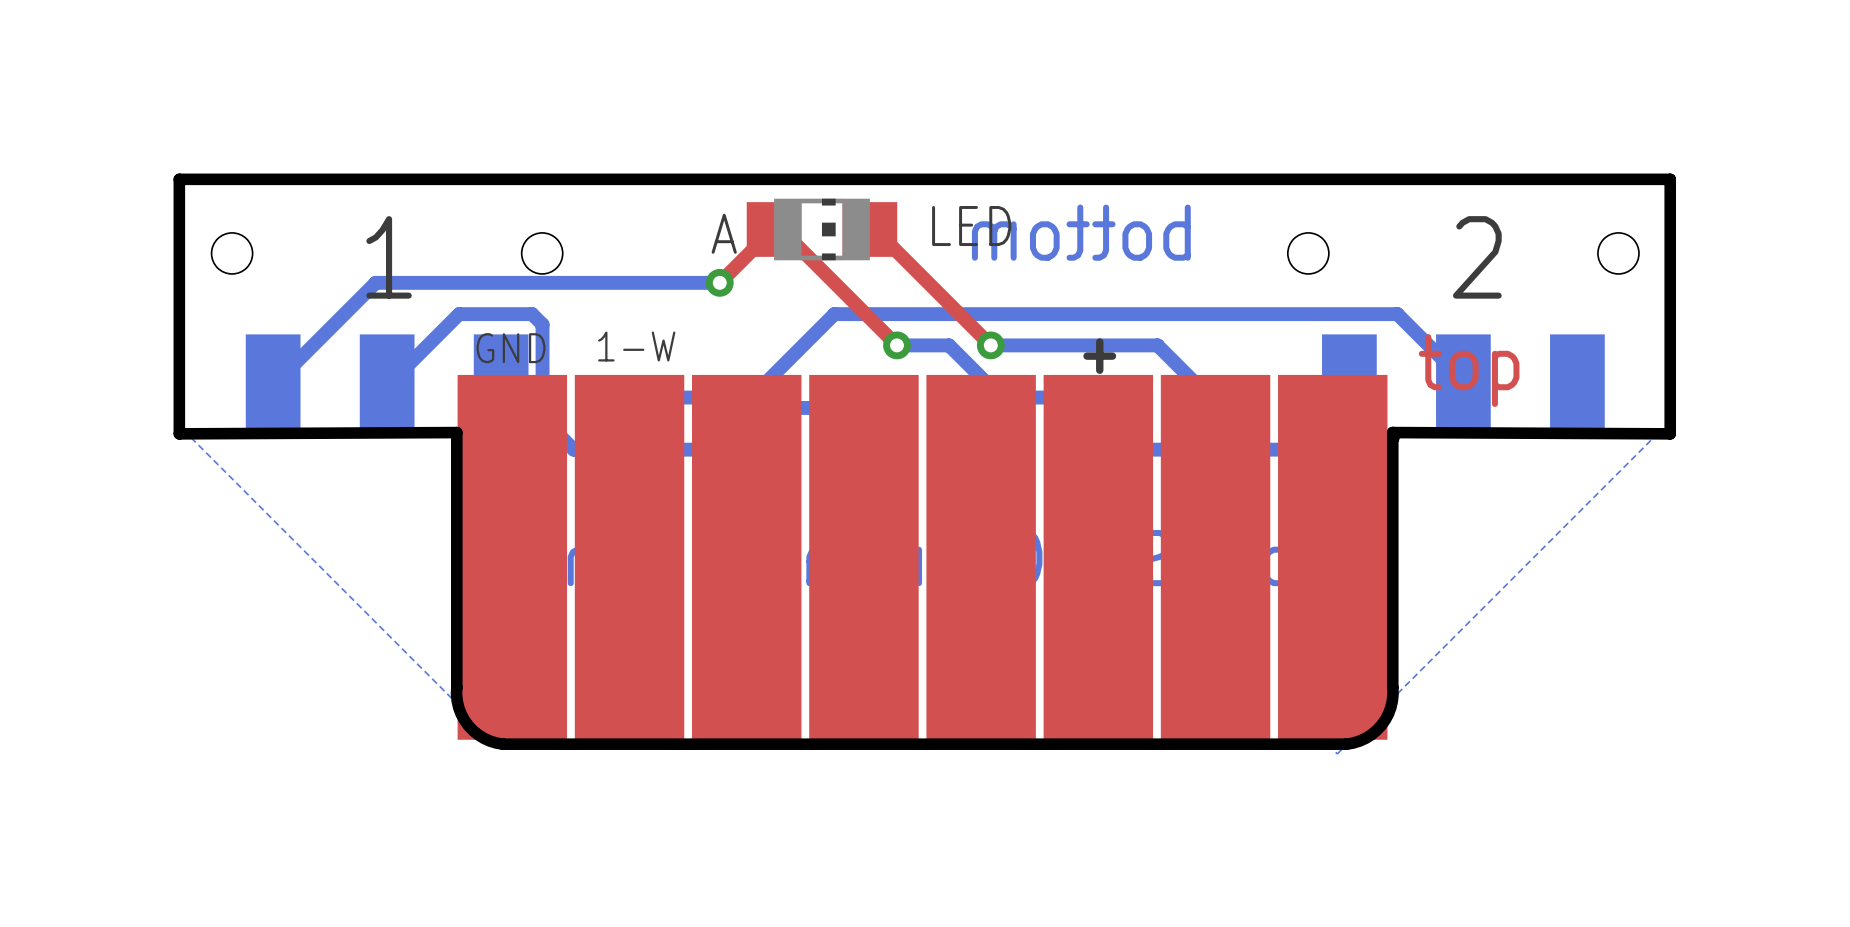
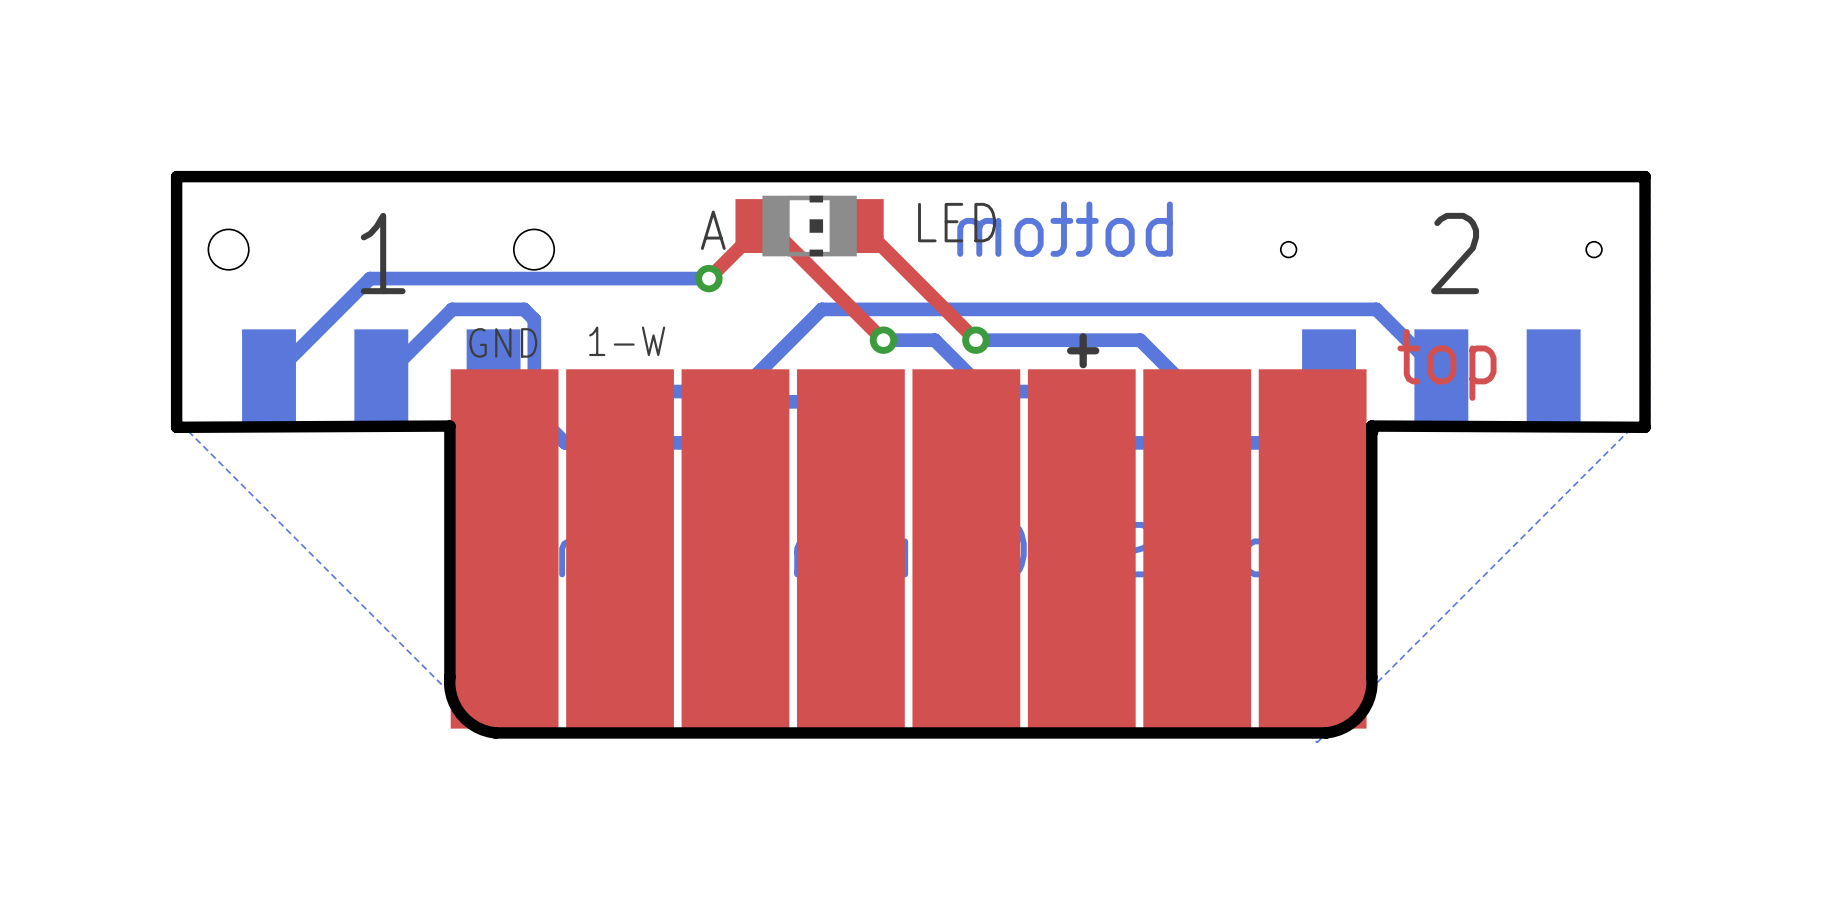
part footprint: [1287, 232, 1639, 435] -> [1280, 241, 1602, 429]

